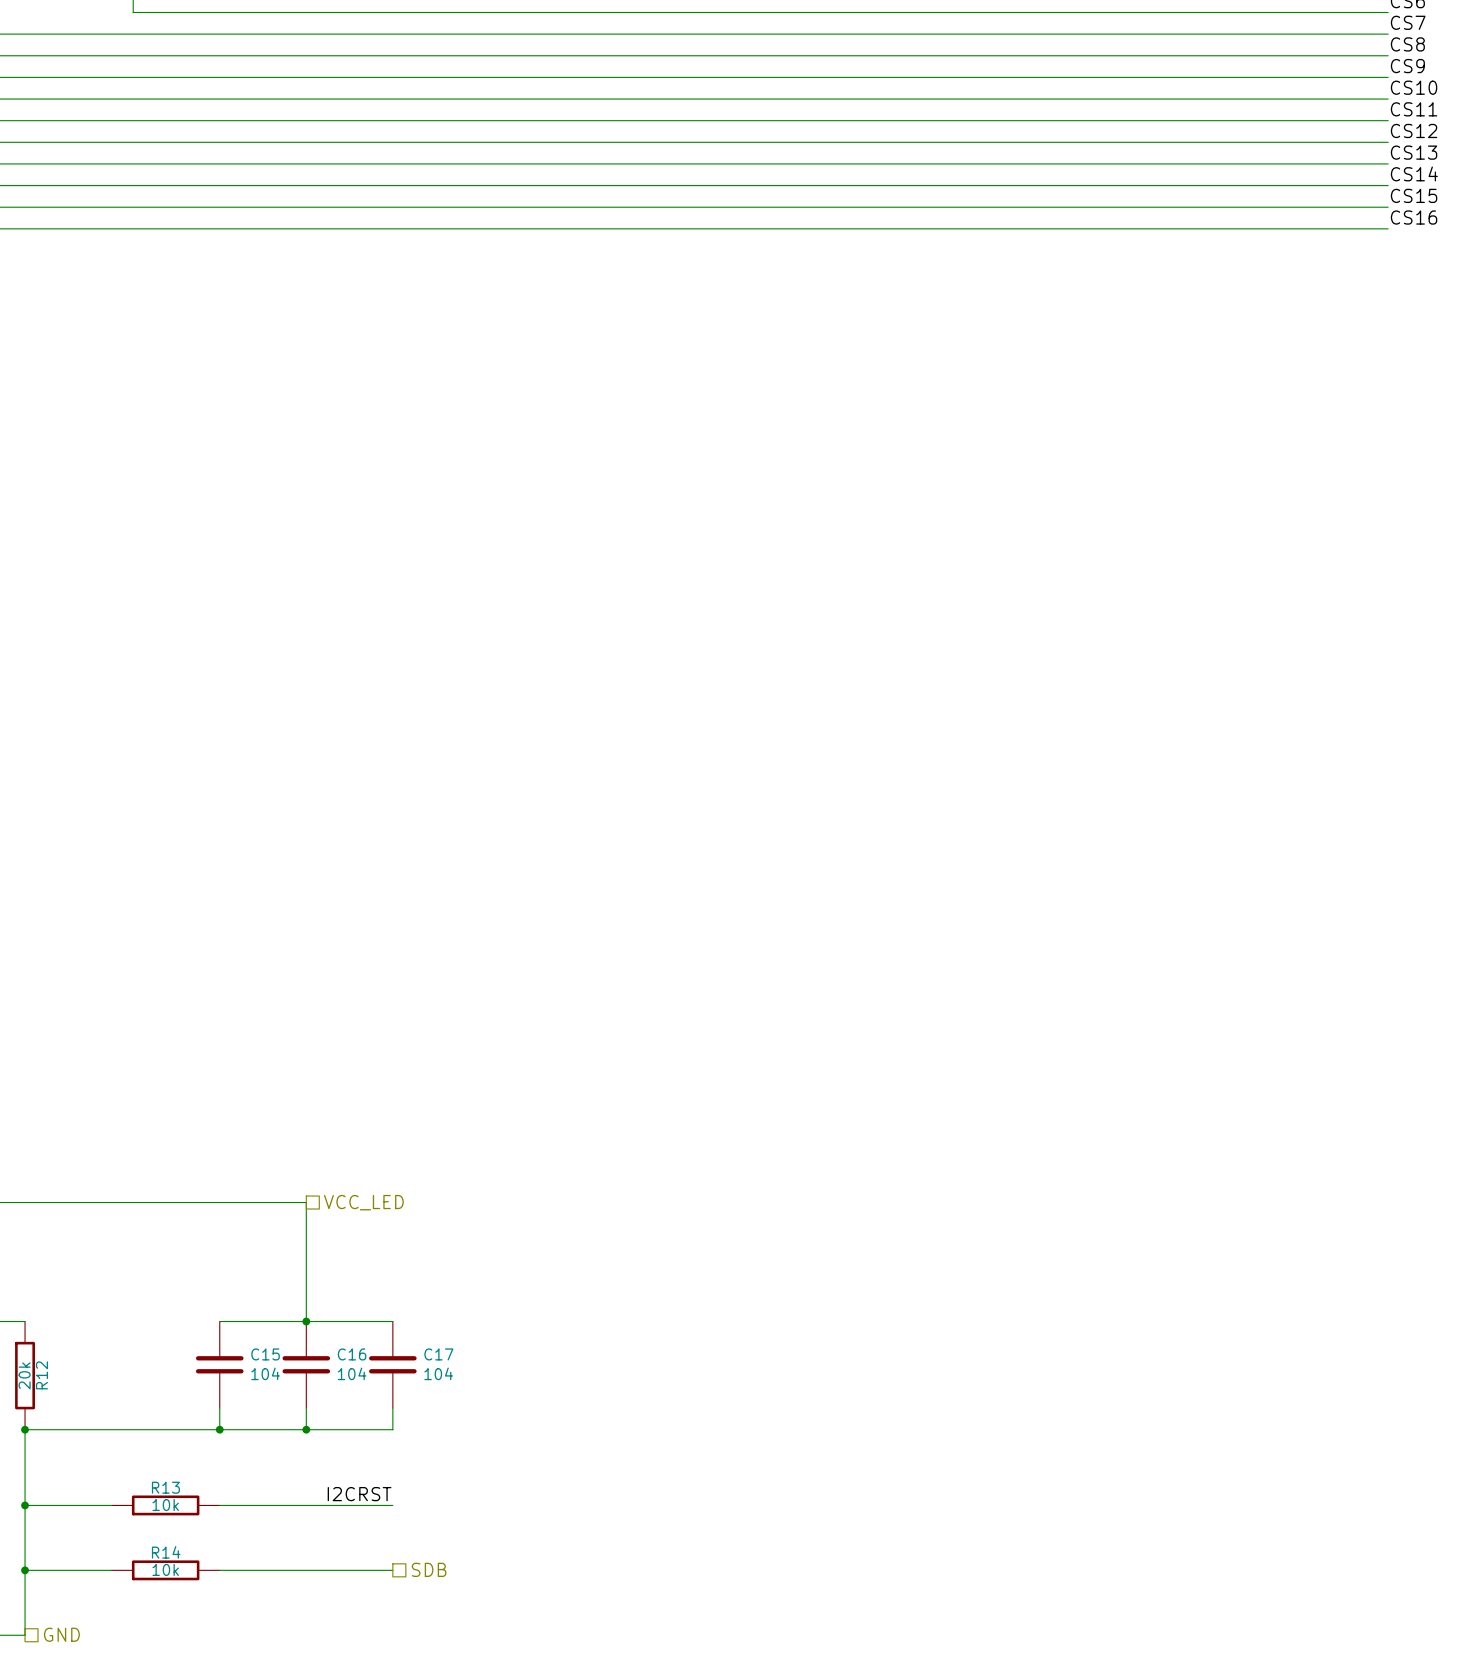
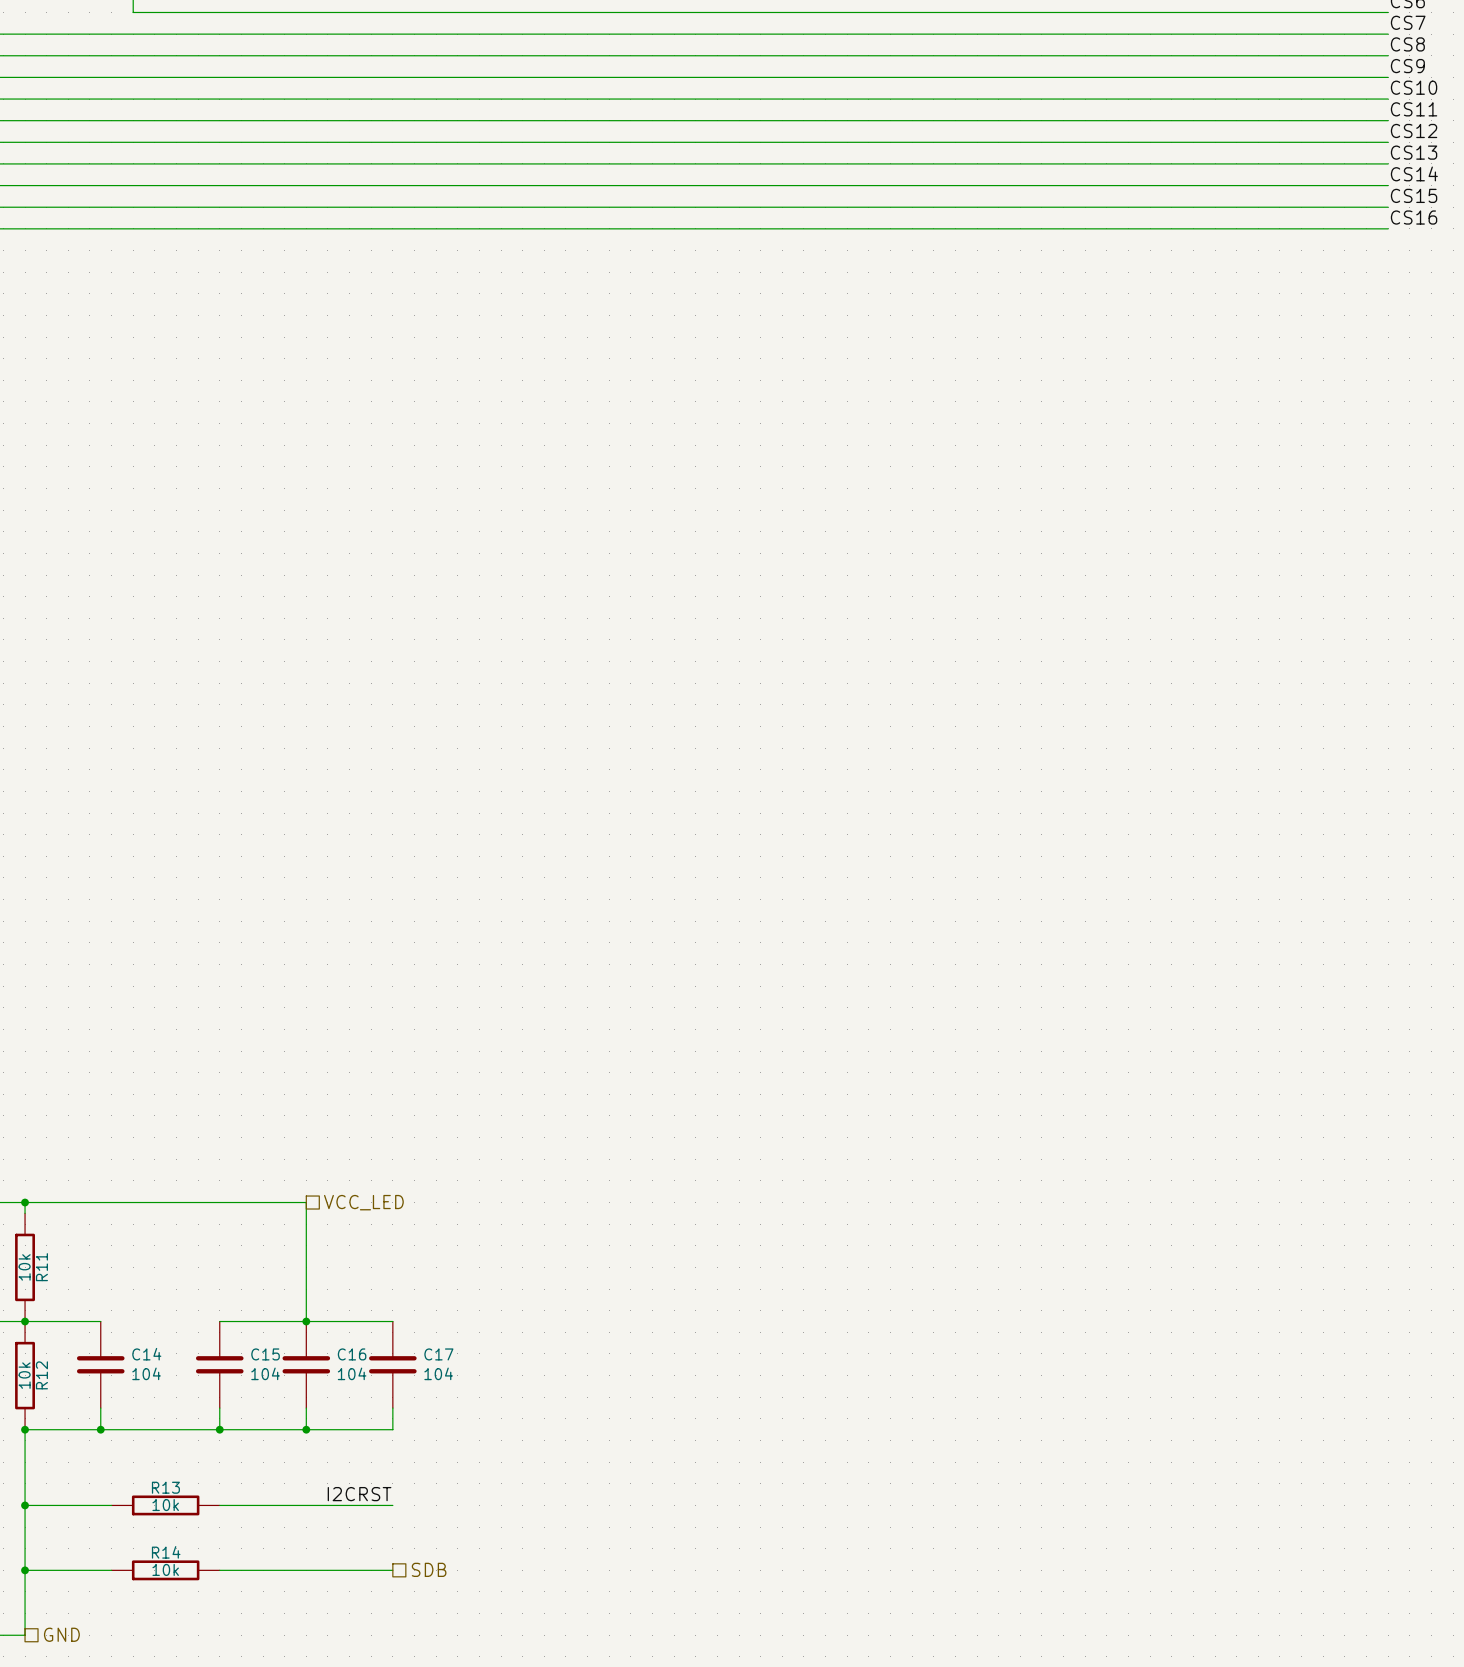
wire: none -> (25, 1202) (25, 1213)
junction: none -> (25, 1202)
R11: none -> 10k (25, 1267)
wire: none -> (25, 1321) (100, 1321)
junction: none -> (25, 1321)
C14: none -> 104 (100, 1364)
R12 value: 20k (24, 1375) -> 10k (24, 1375)
wire: none -> (100, 1408) (100, 1429)
junction: none -> (100, 1429)

